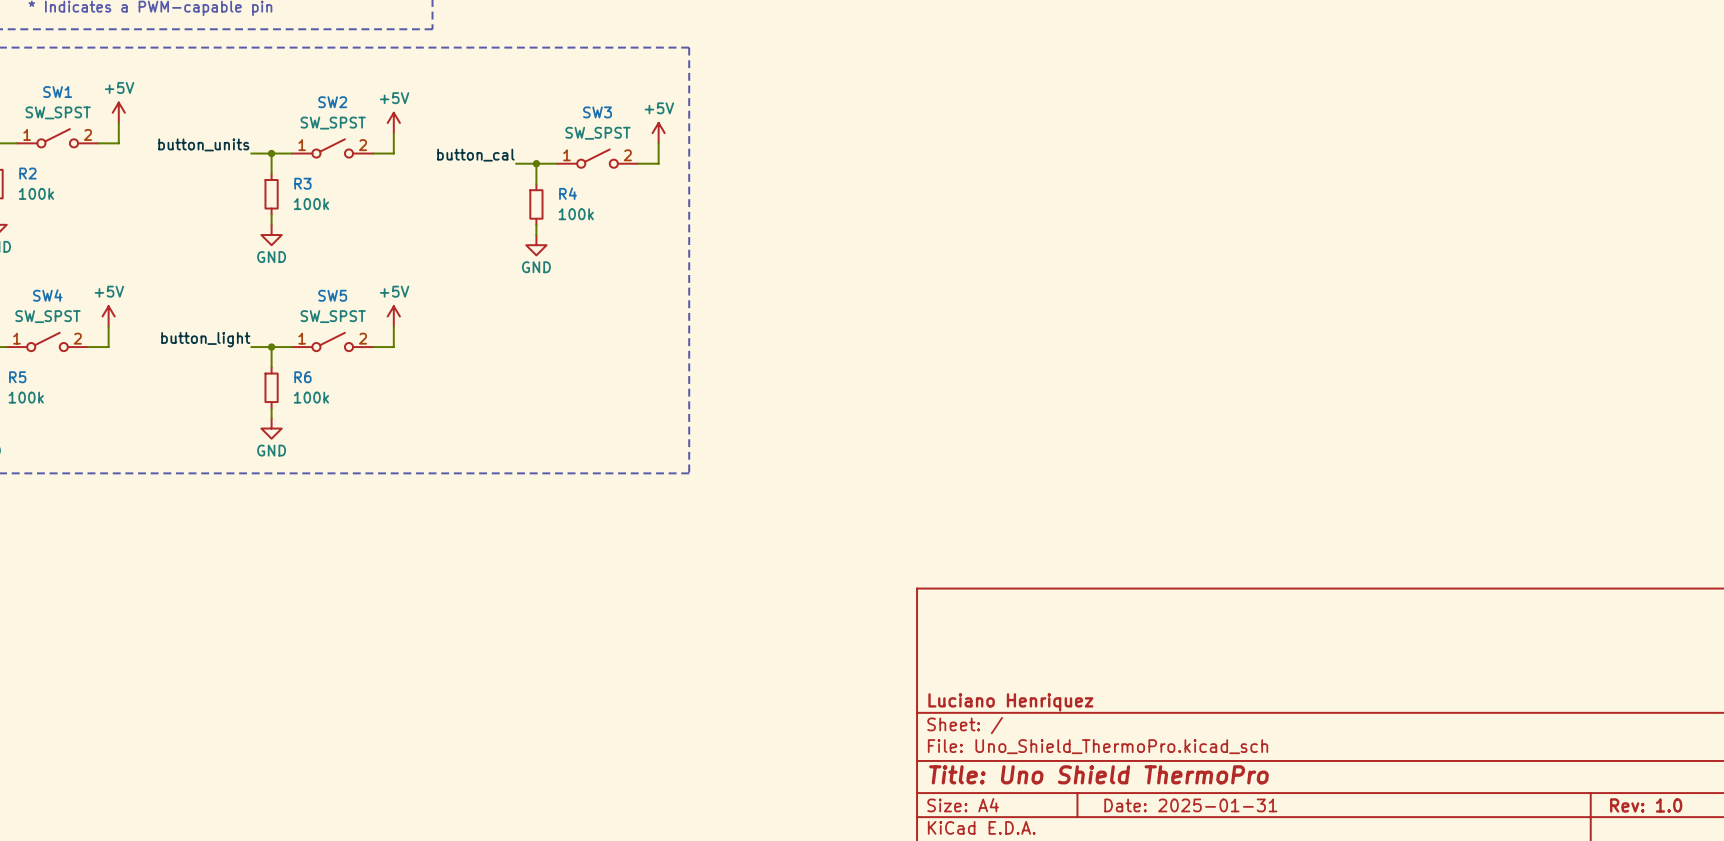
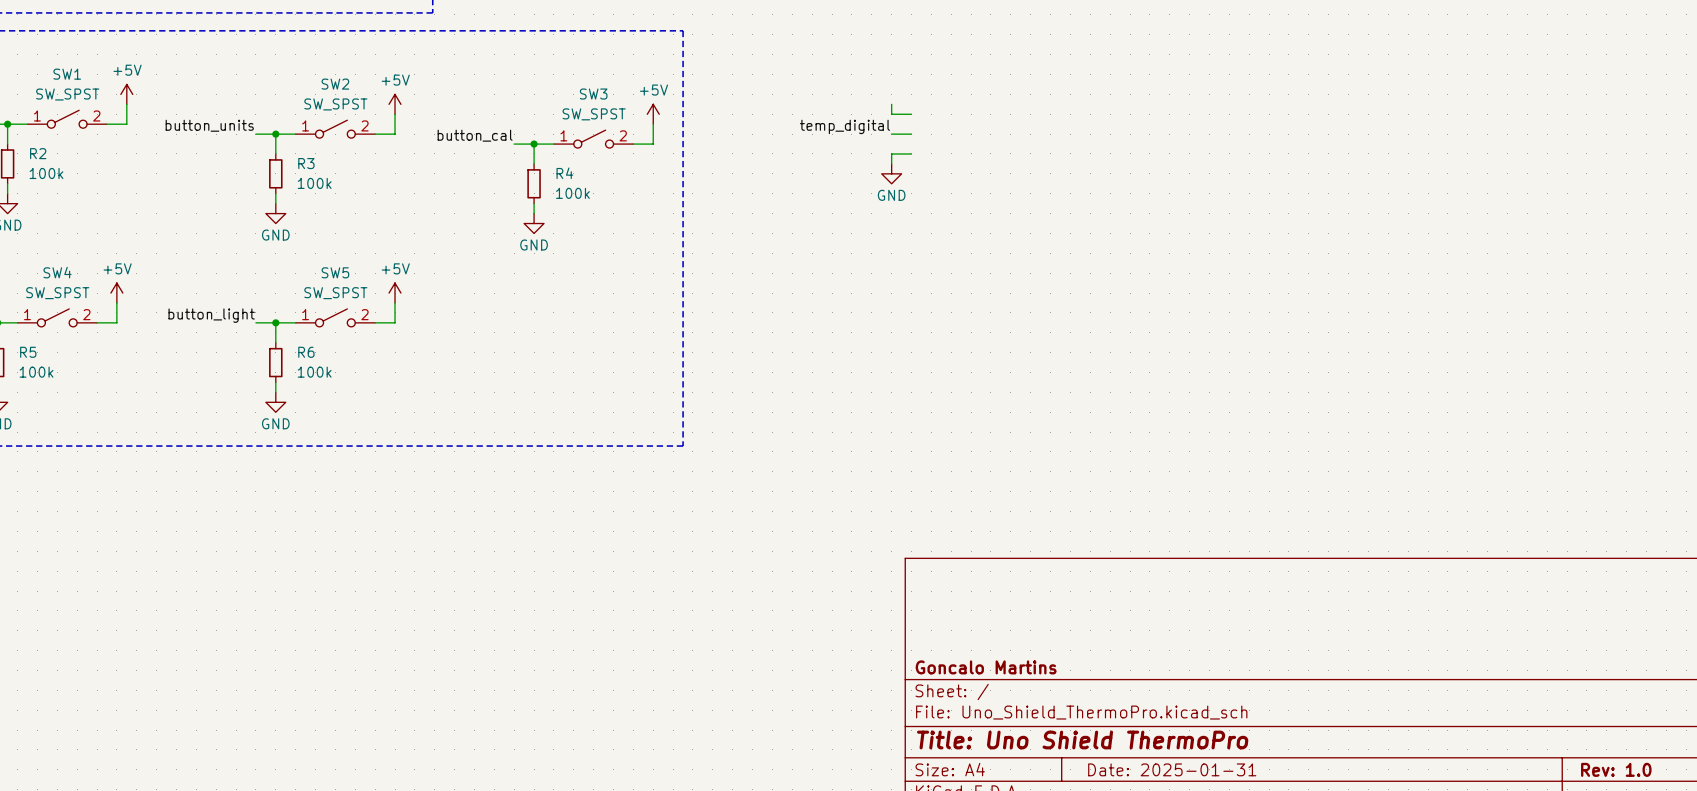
wire: none -> (891, 104) (891, 114) (911, 114)
label: none -> temp_digital (844, 126)
wire: none -> (891, 134) (911, 134)
wire: none -> (911, 153) (891, 153) (891, 163)
power symbol: none -> GND (891, 173)
title block: Luciano Henriquez (1010, 702) -> Goncalo Martins (986, 667)

